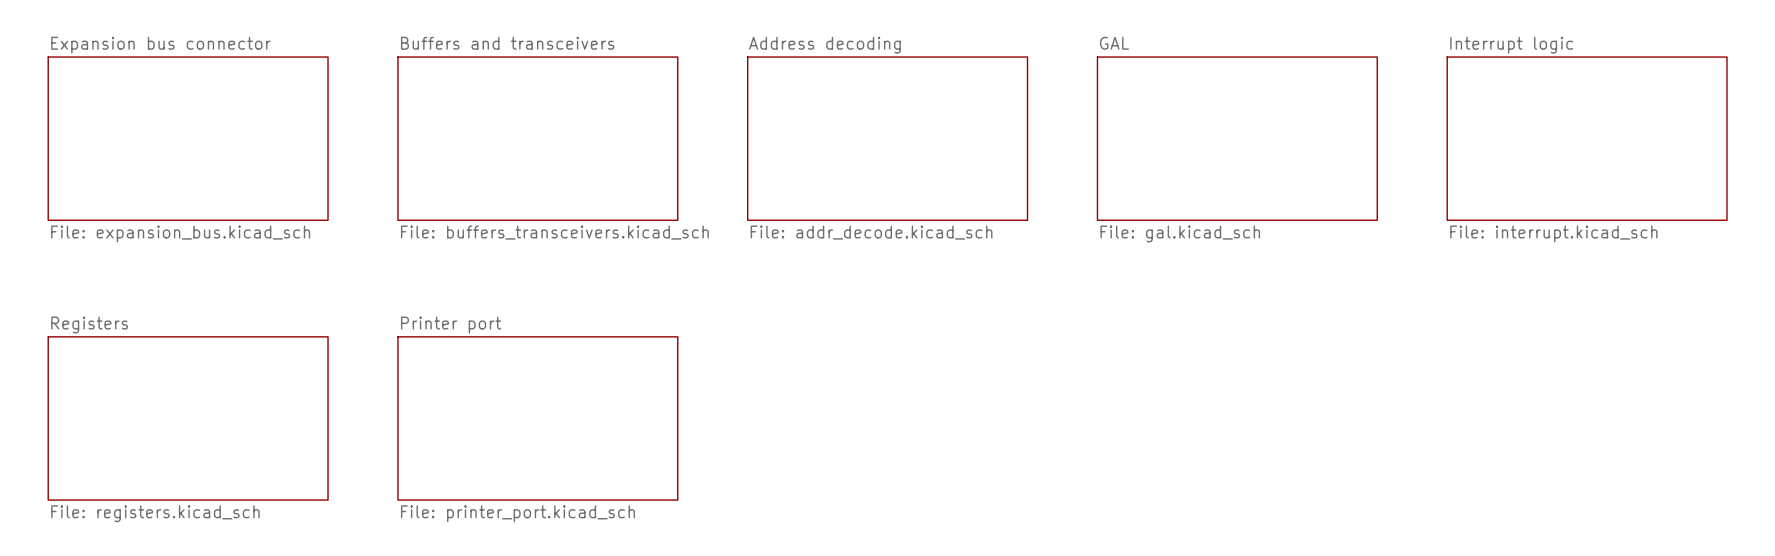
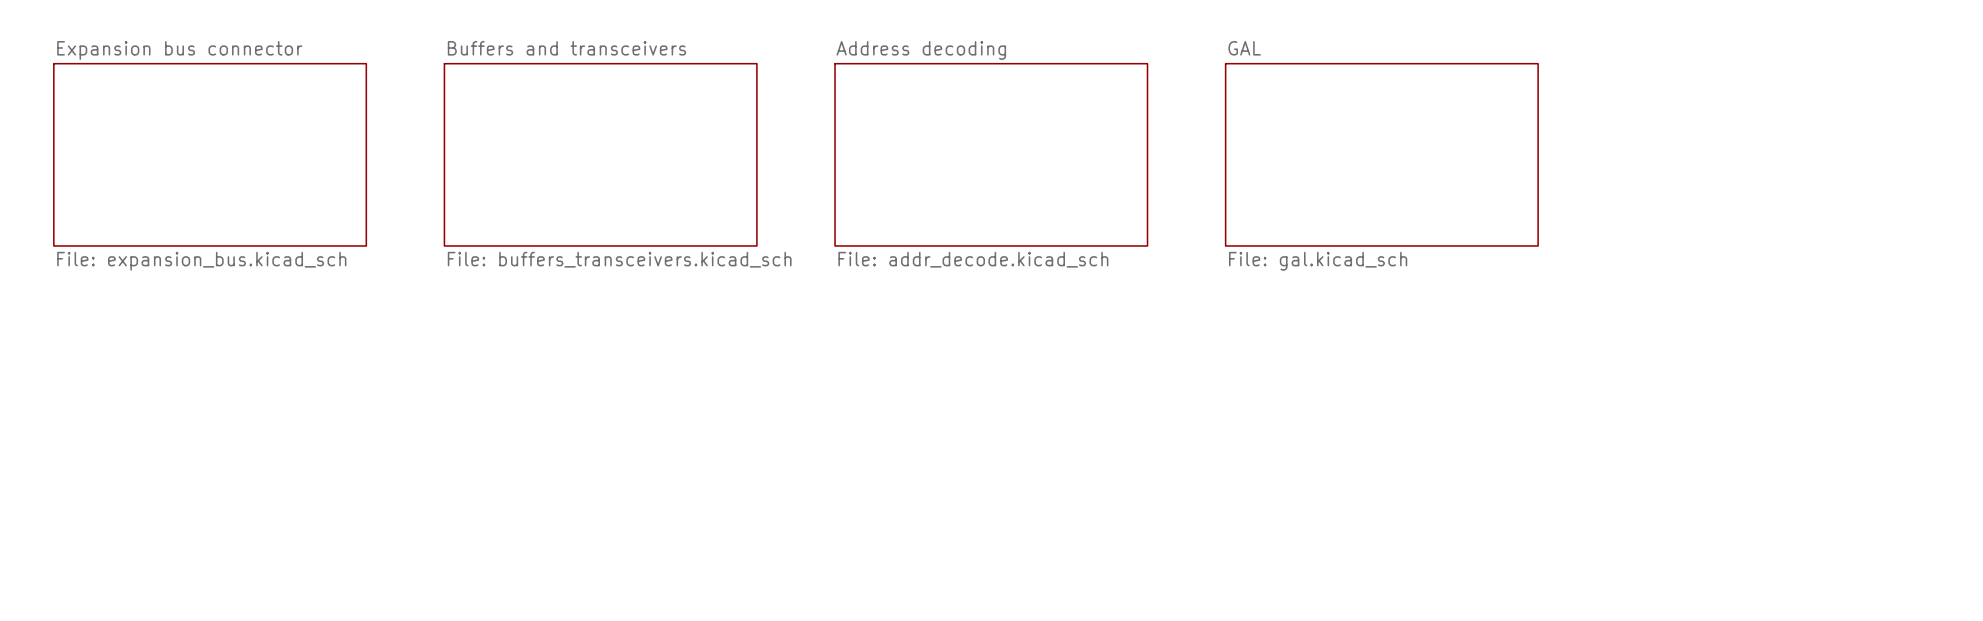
sheet Interrupt logic: File: interrupt.kicad_sch (1587, 138) -> none
sheet Registers: File: registers.kicad_sch (188, 418) -> none
sheet Printer port: File: printer_port.kicad_sch (537, 418) -> none

